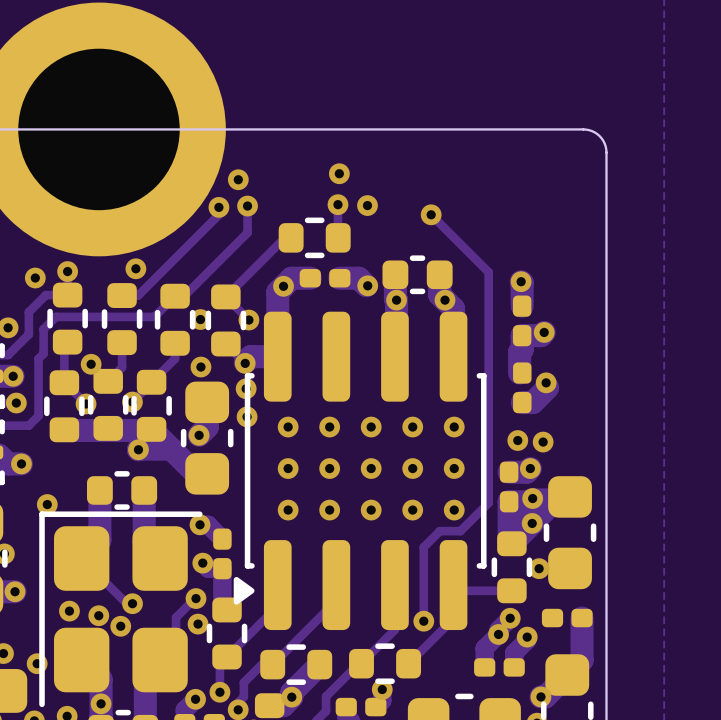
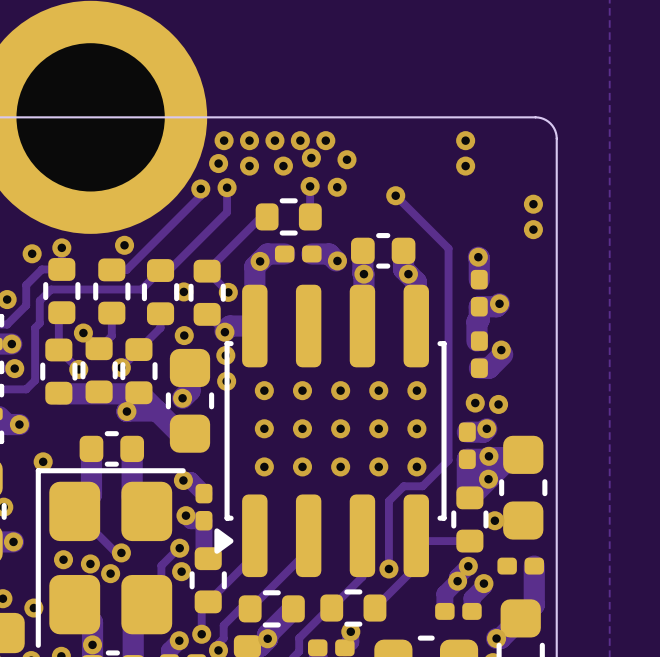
via: none -> (224, 140)
via: none -> (249, 140)
via: none -> (274, 140)
via: none -> (300, 140)
via: none -> (325, 140)
via: none -> (465, 140)
via: none -> (346, 159)
via: none -> (249, 166)
via: none -> (283, 166)
via: none -> (465, 166)
via: none -> (533, 204)
via: none -> (533, 229)

